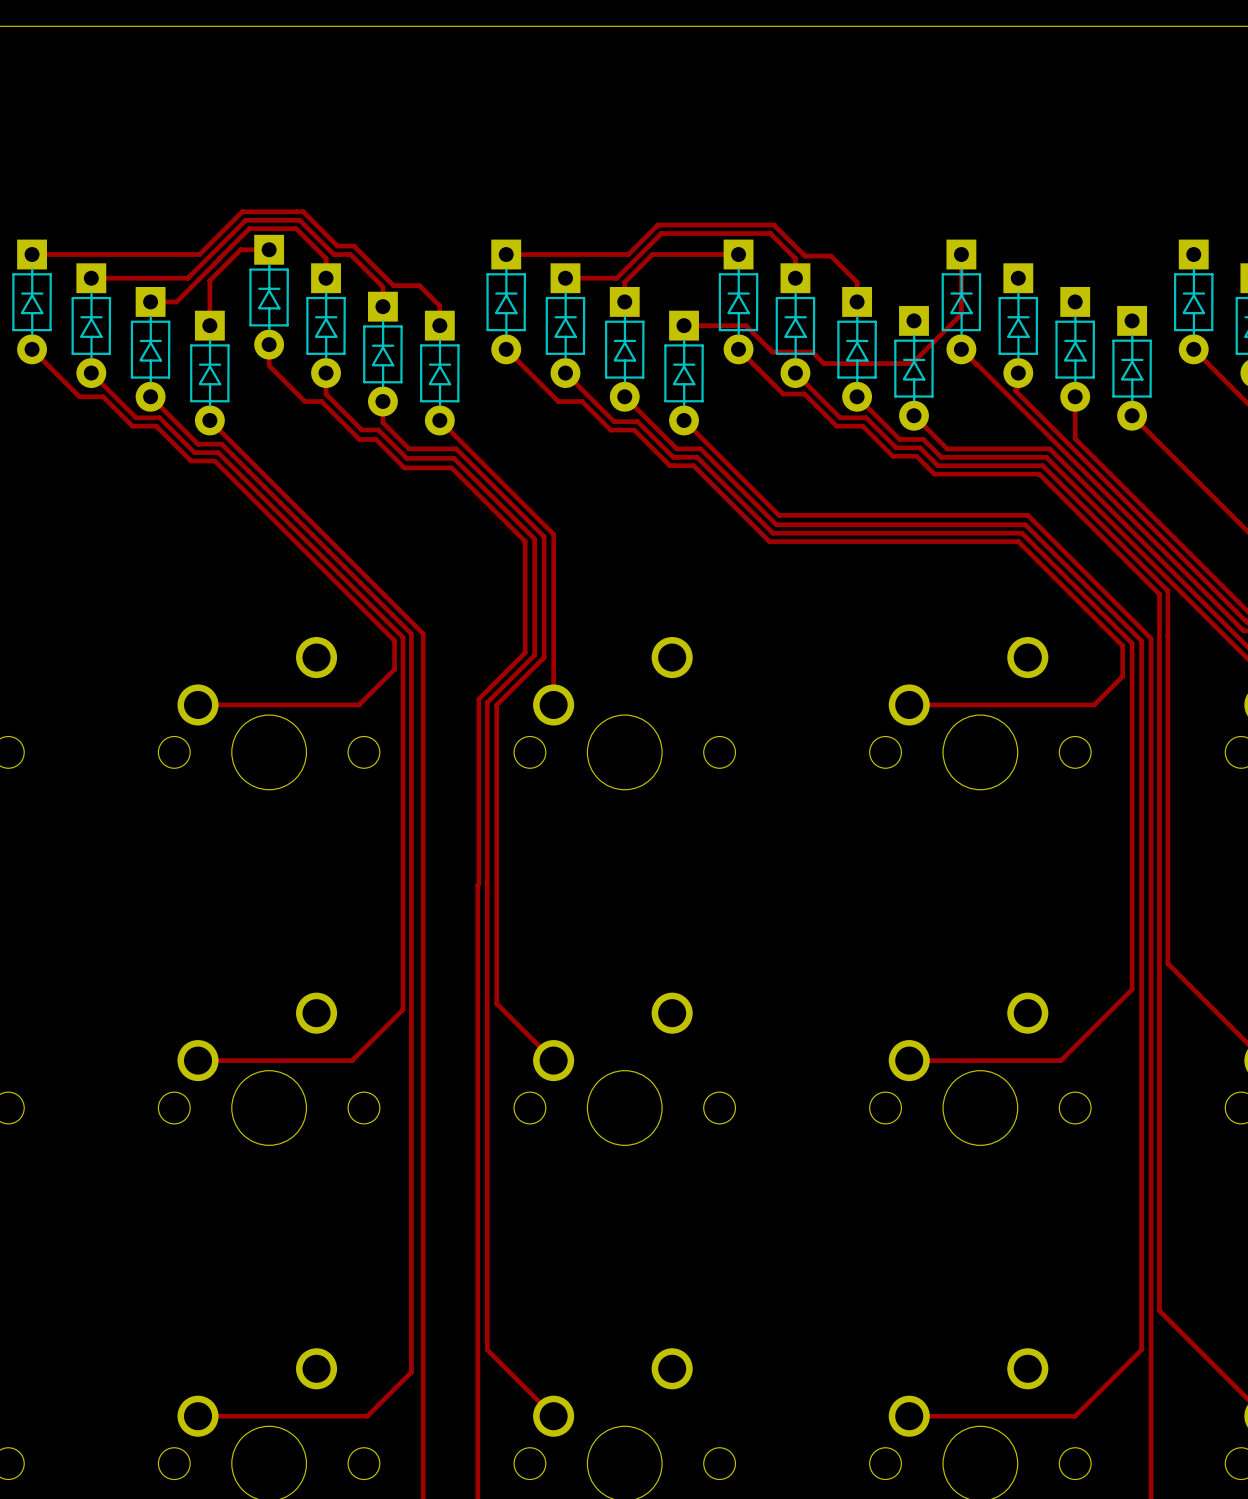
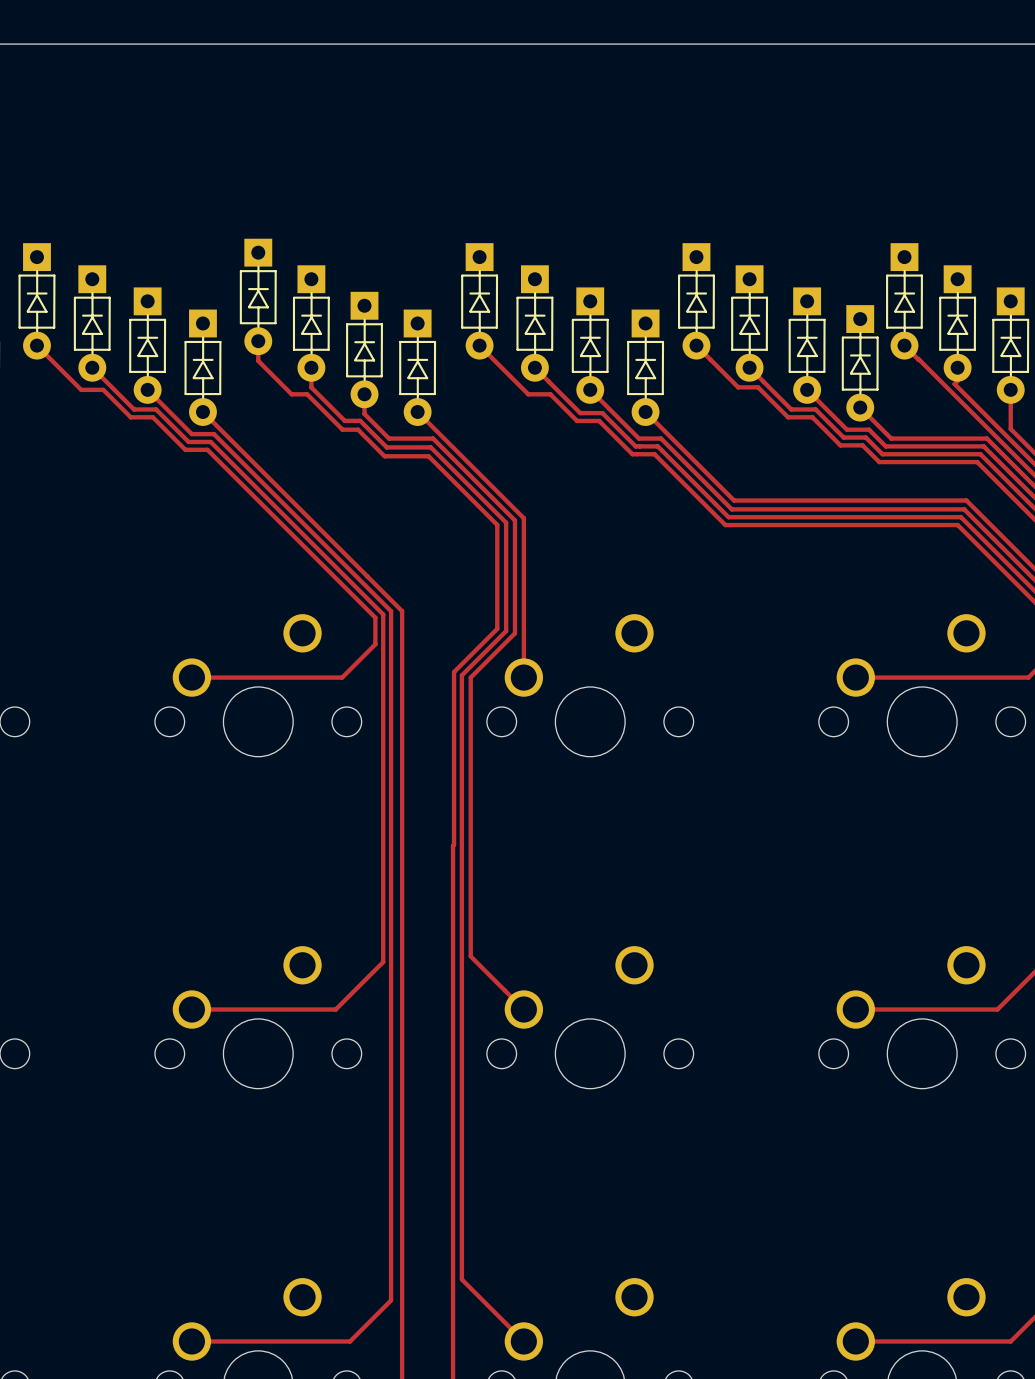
track: (269, 249) (240, 249) (209, 280) (209, 325) -> none
track: (32, 254) (199, 254) (242, 211) (303, 211) (337, 246) (353, 246) (393, 285) (419, 285) (439, 305) (439, 325) -> none
track: (506, 254) (628, 254) (658, 225) (773, 225) (804, 256) (830, 256) (857, 282) (857, 301) -> none
track: (738, 254) (652, 254) (624, 282) (624, 301) -> none
track: (961, 254) (961, 314) (912, 363) (823, 363) (812, 352) (772, 352) (745, 325) (684, 325) -> none
track: (91, 278) (188, 278) (245, 220) (299, 220) (333, 254) (350, 254) (382, 287) (382, 306) -> none
track: (326, 278) (326, 258) (296, 228) (249, 228) (176, 301) (150, 301) -> none
track: (565, 278) (616, 278) (661, 233) (770, 233) (795, 258) (795, 278) -> none

